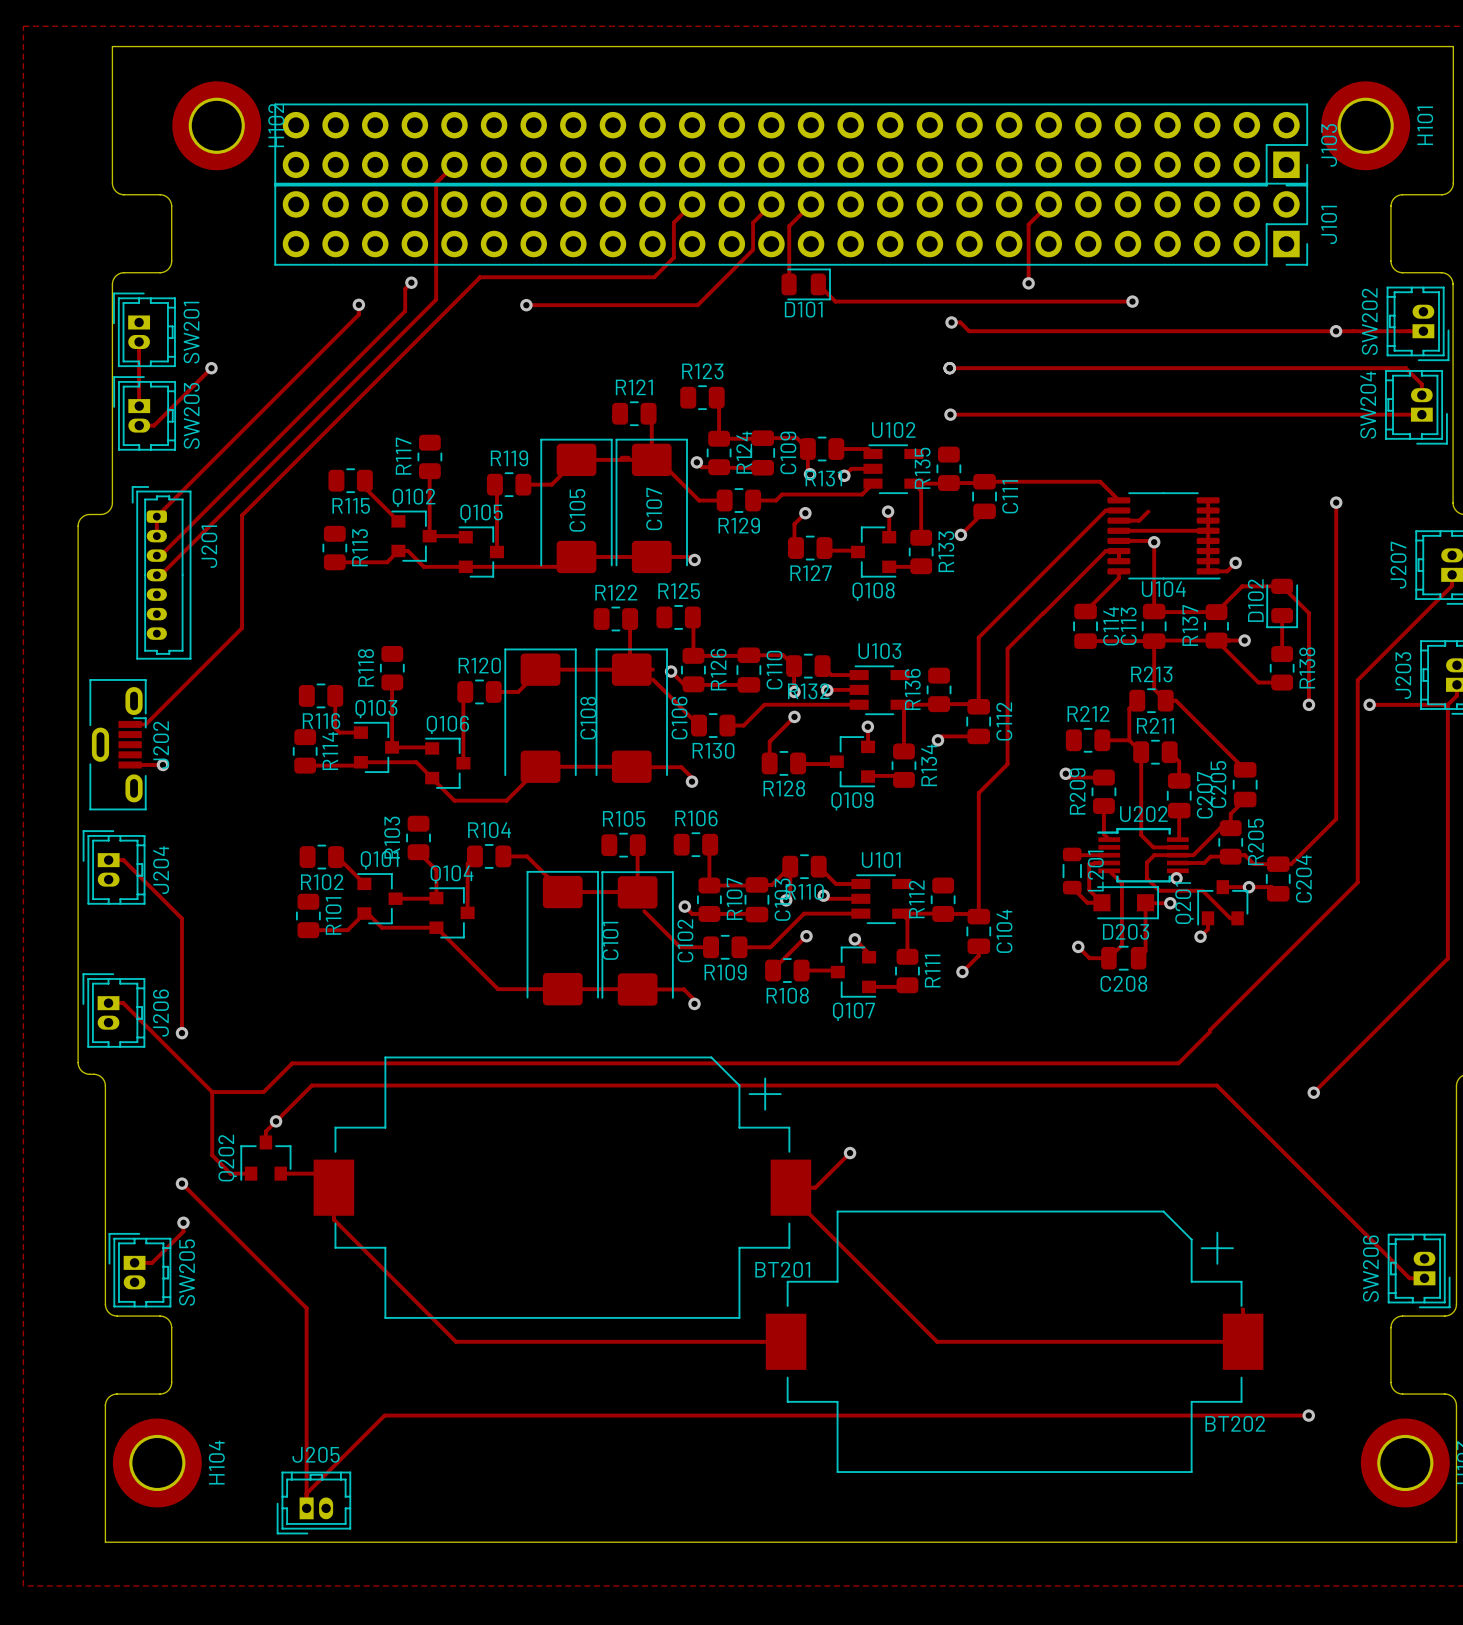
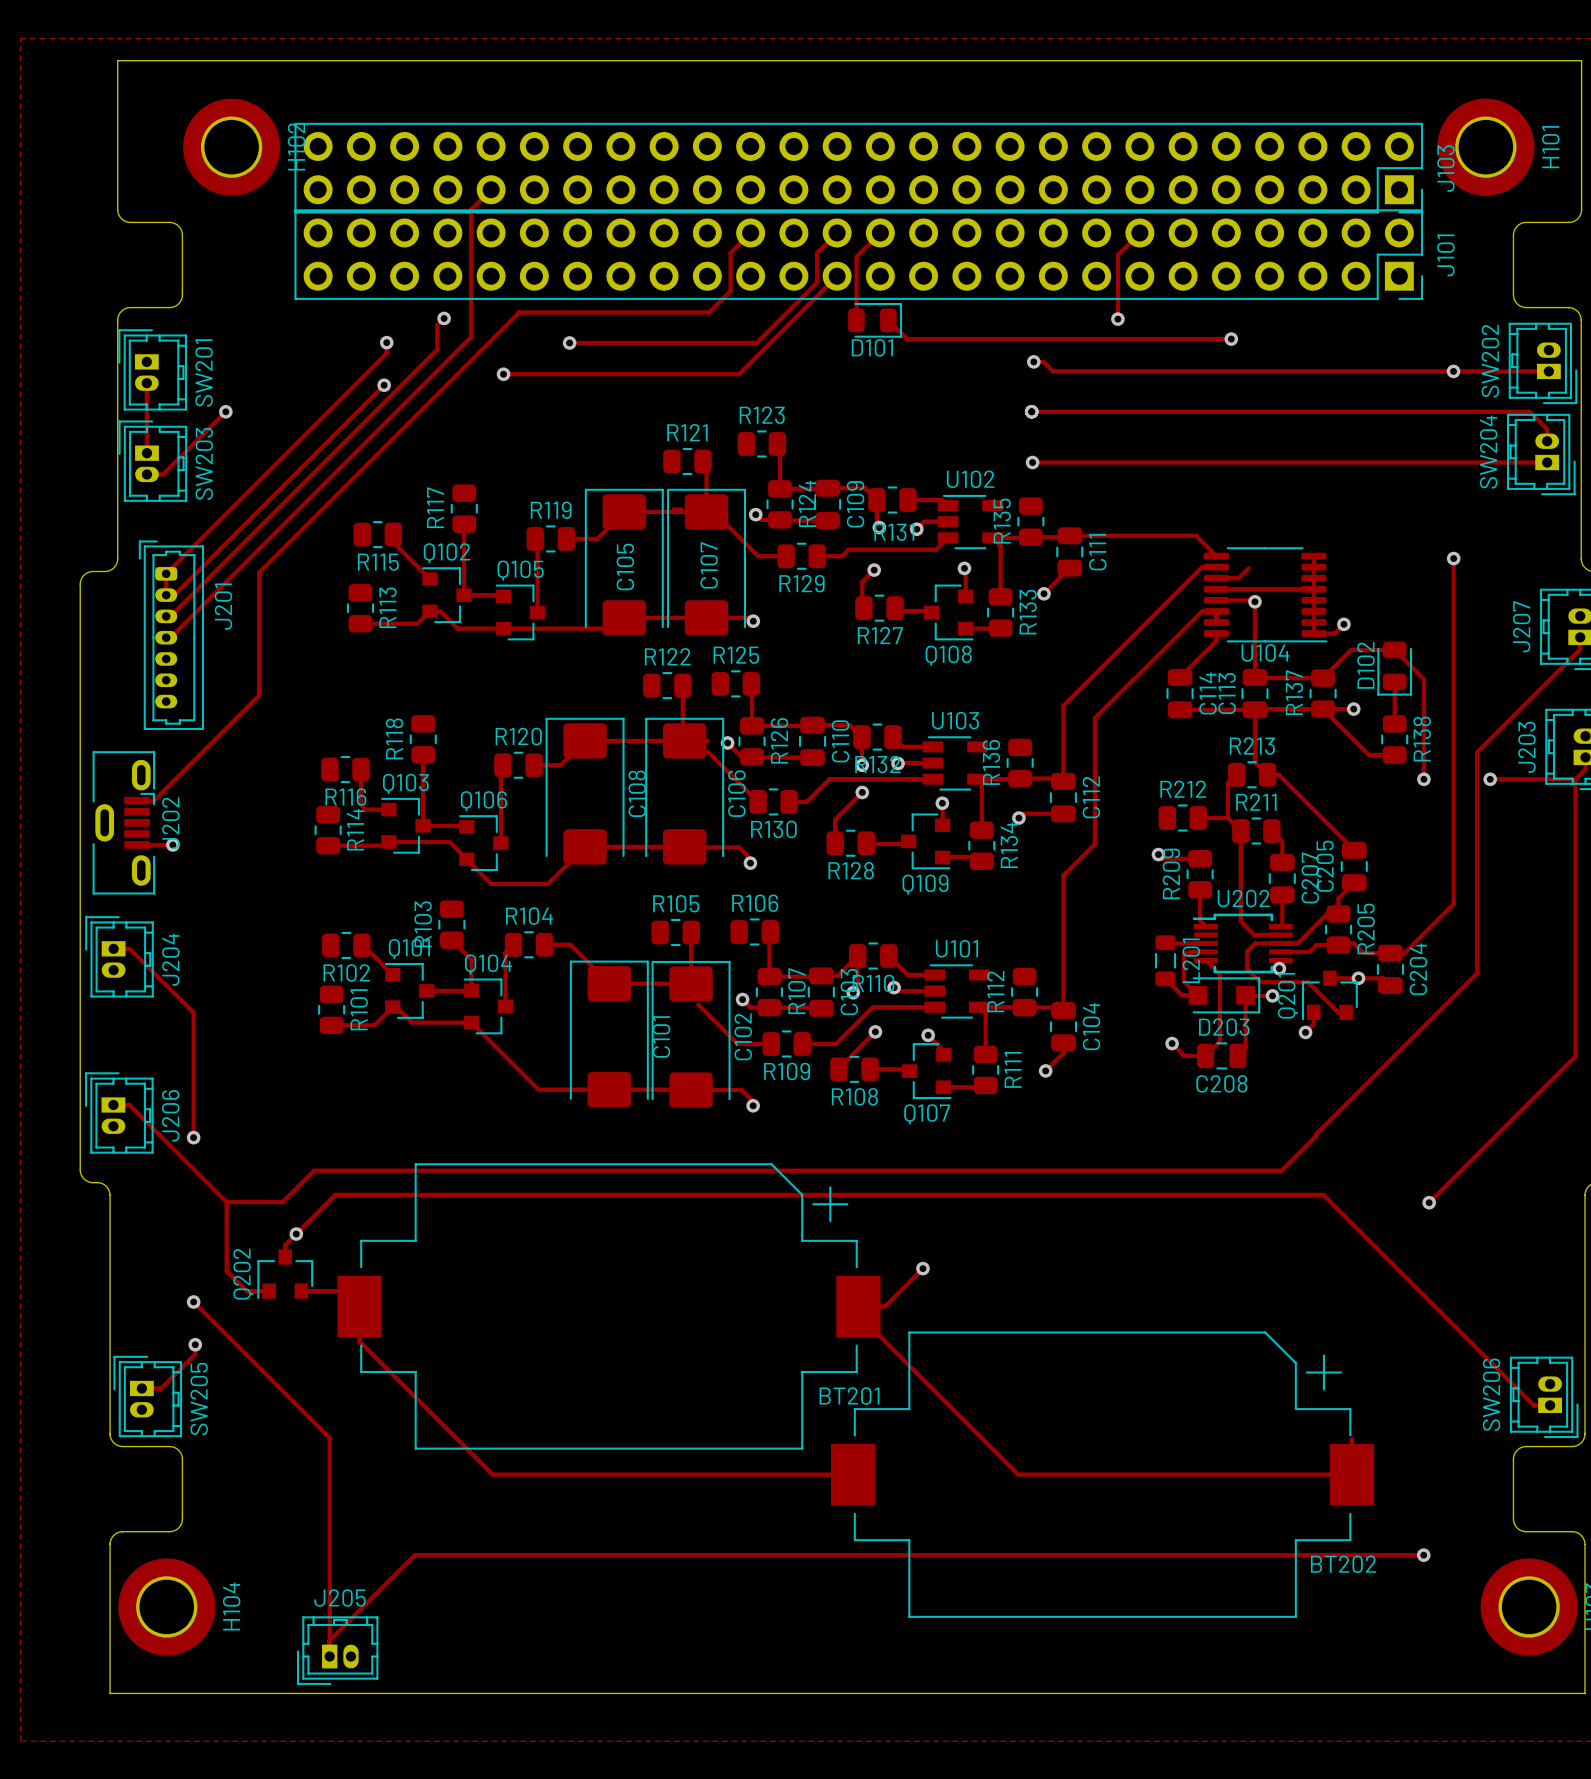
track: none -> (837, 276) (739, 374) (503, 374)
via: none -> (503, 374)
track: none -> (384, 385) (174, 595) (166, 595)
via: none -> (384, 385)

